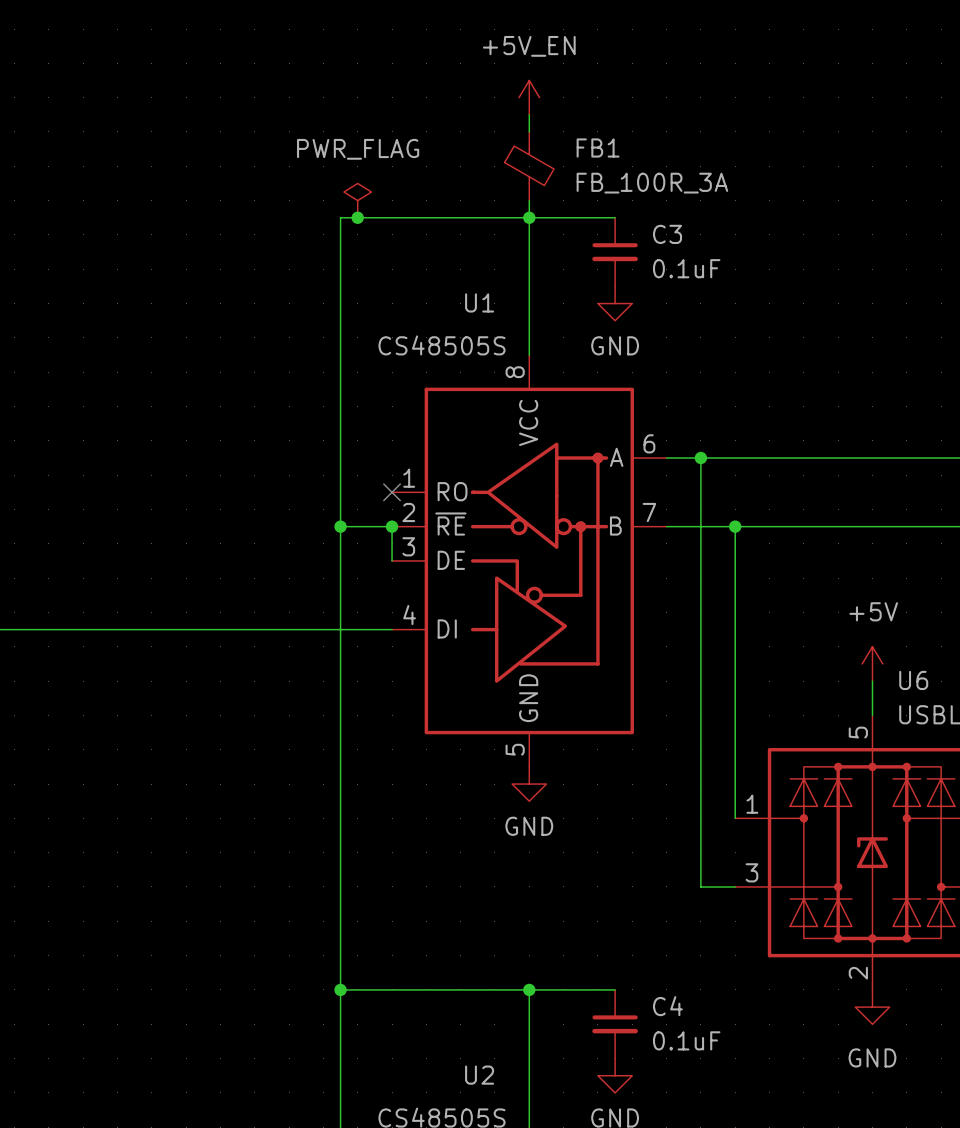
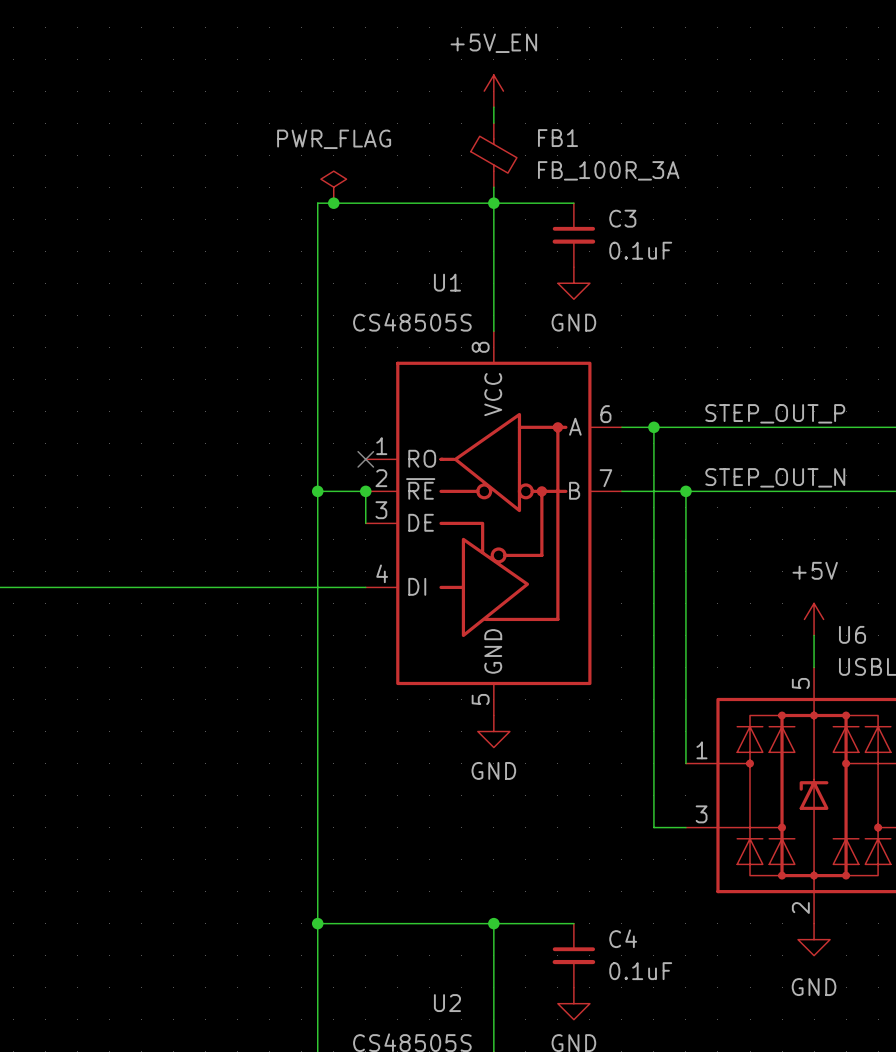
label: none -> STEP_OUT_P (775, 413)
label: none -> STEP_OUT_N (775, 477)

